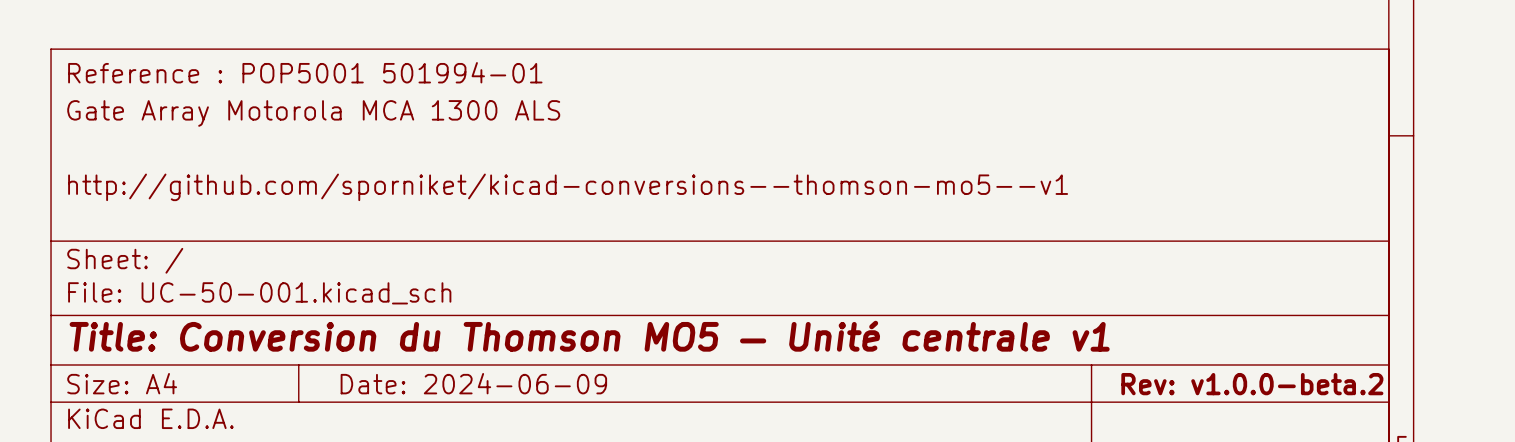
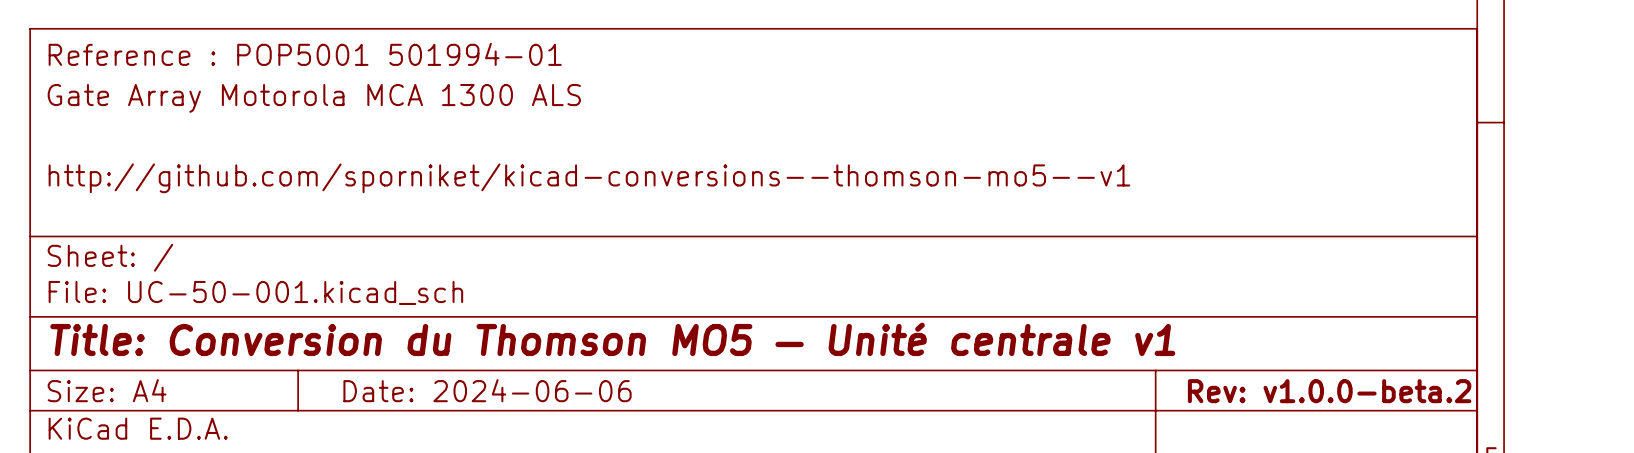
title block: Date: 2024-06-09 (473, 383) -> Date: 2024-06-06 (487, 390)

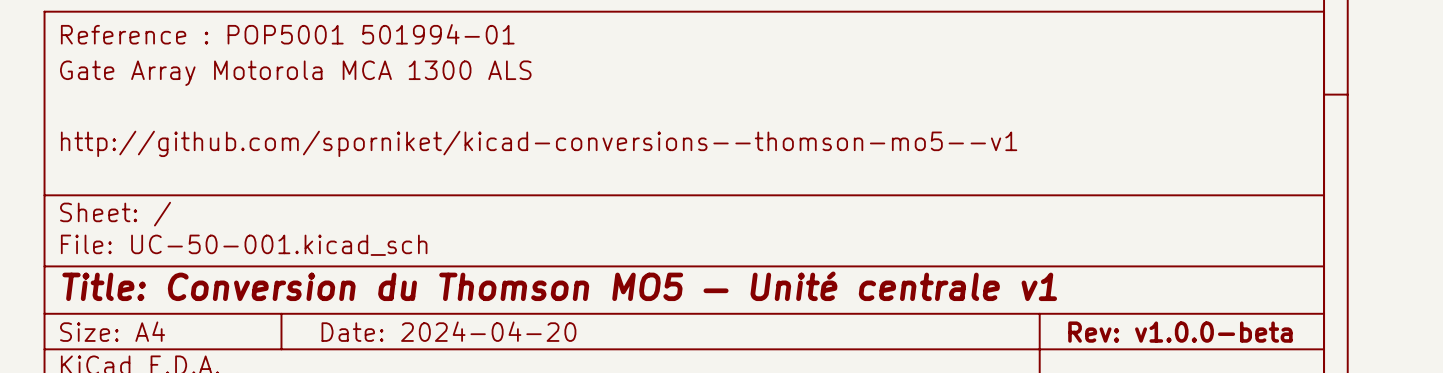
title block: Date: 2024-06-06 (487, 390) -> Date: 2024-04-20 (448, 331)
title block: Rev: v1.0.0-beta.2 (1329, 391) -> Rev: v1.0.0-beta (1180, 332)

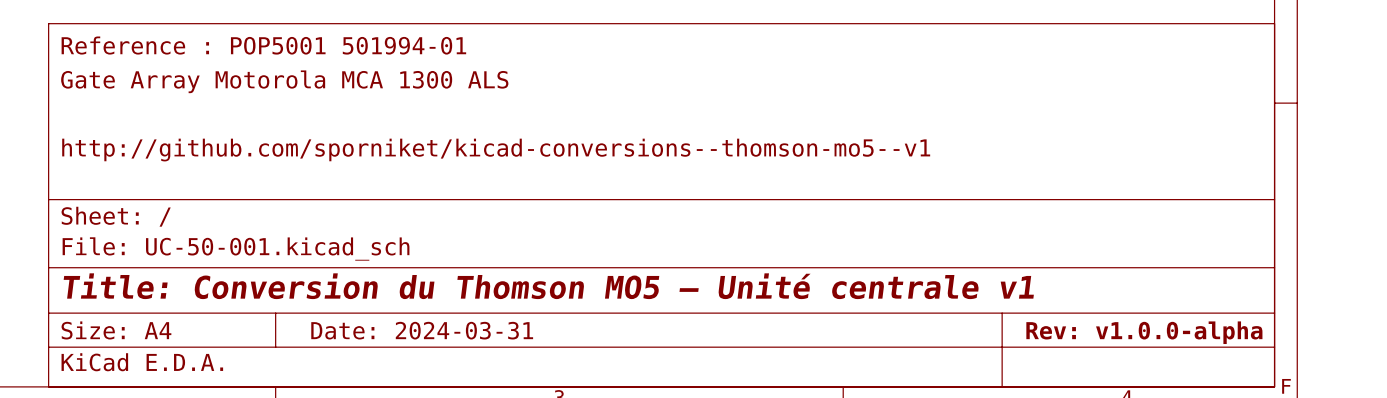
title block: Date: 2024-04-20 (448, 331) -> Date: 2024-03-31 (422, 330)
title block: Rev: v1.0.0-beta (1180, 332) -> Rev: v1.0.0-alpha (1144, 332)

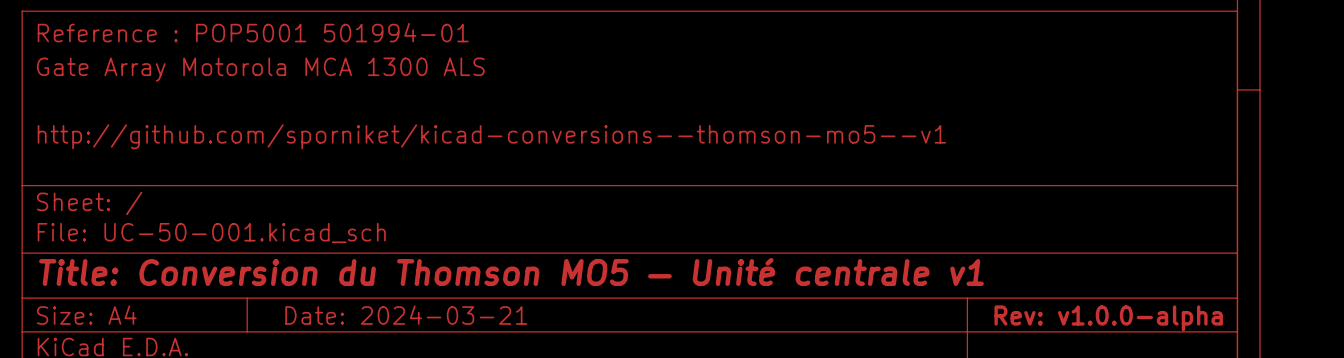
title block: Date: 2024-03-31 (422, 330) -> Date: 2024-03-21 (406, 315)

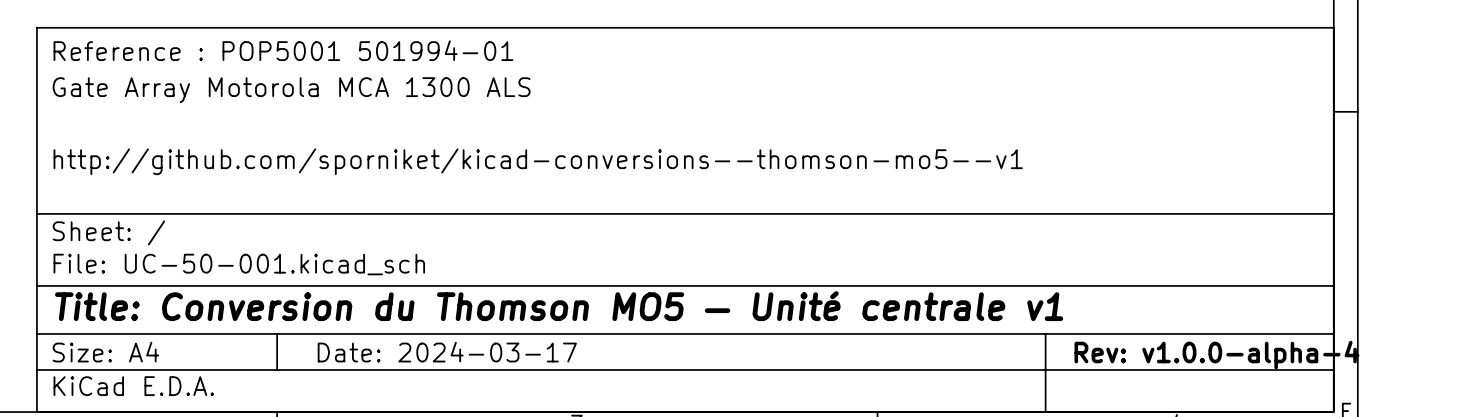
title block: Date: 2024-03-21 (406, 315) -> Date: 2024-03-17 (447, 352)
title block: Rev: v1.0.0-alpha (1108, 318) -> Rev: v1.0.0-alpha-4 (1216, 355)

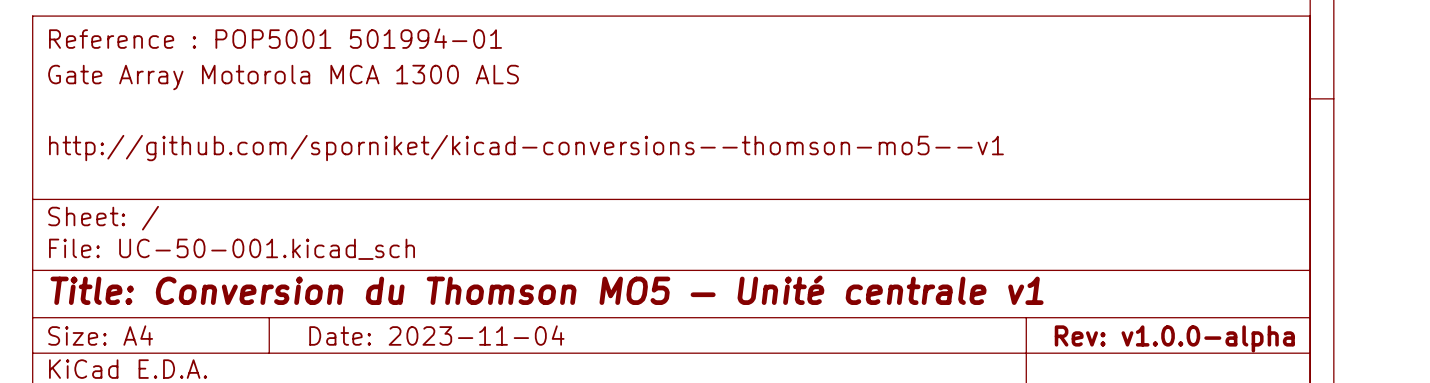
title block: Date: 2024-03-17 (447, 352) -> Date: 2023-11-04 (436, 335)
title block: Rev: v1.0.0-alpha-4 (1216, 355) -> Rev: v1.0.0-alpha (1174, 338)

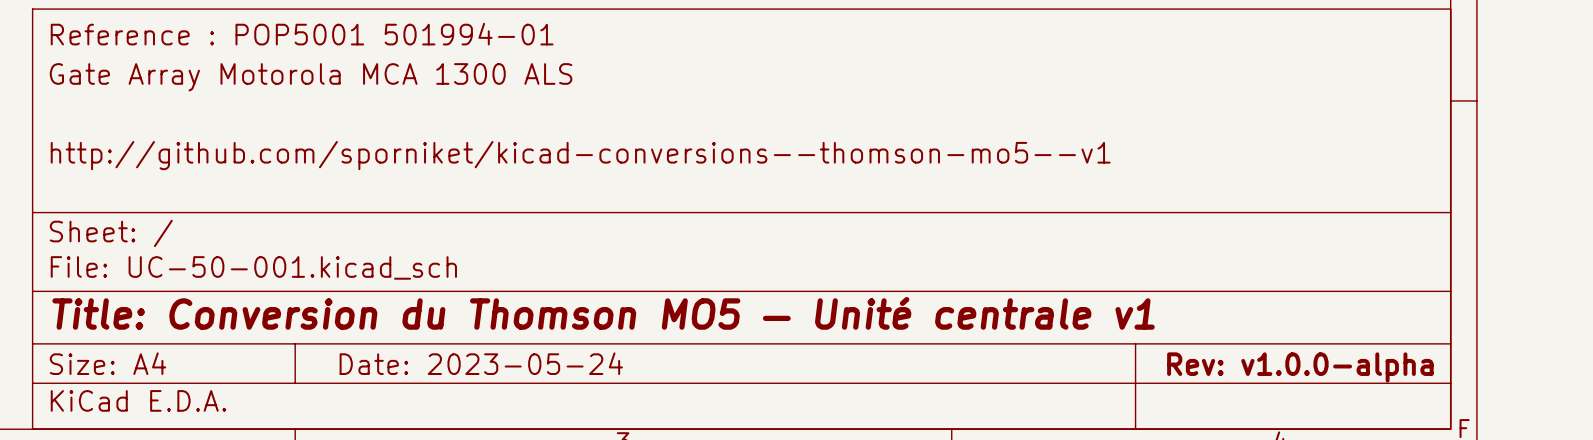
title block: Date: 2023-11-04 (436, 335) -> Date: 2023-05-24 (481, 363)

